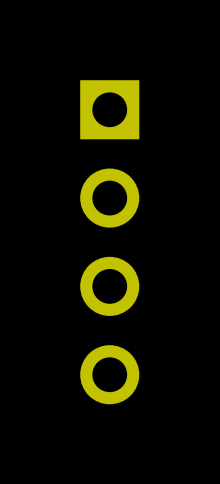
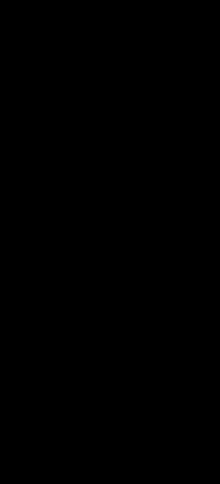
part: (109, 242) -> none

